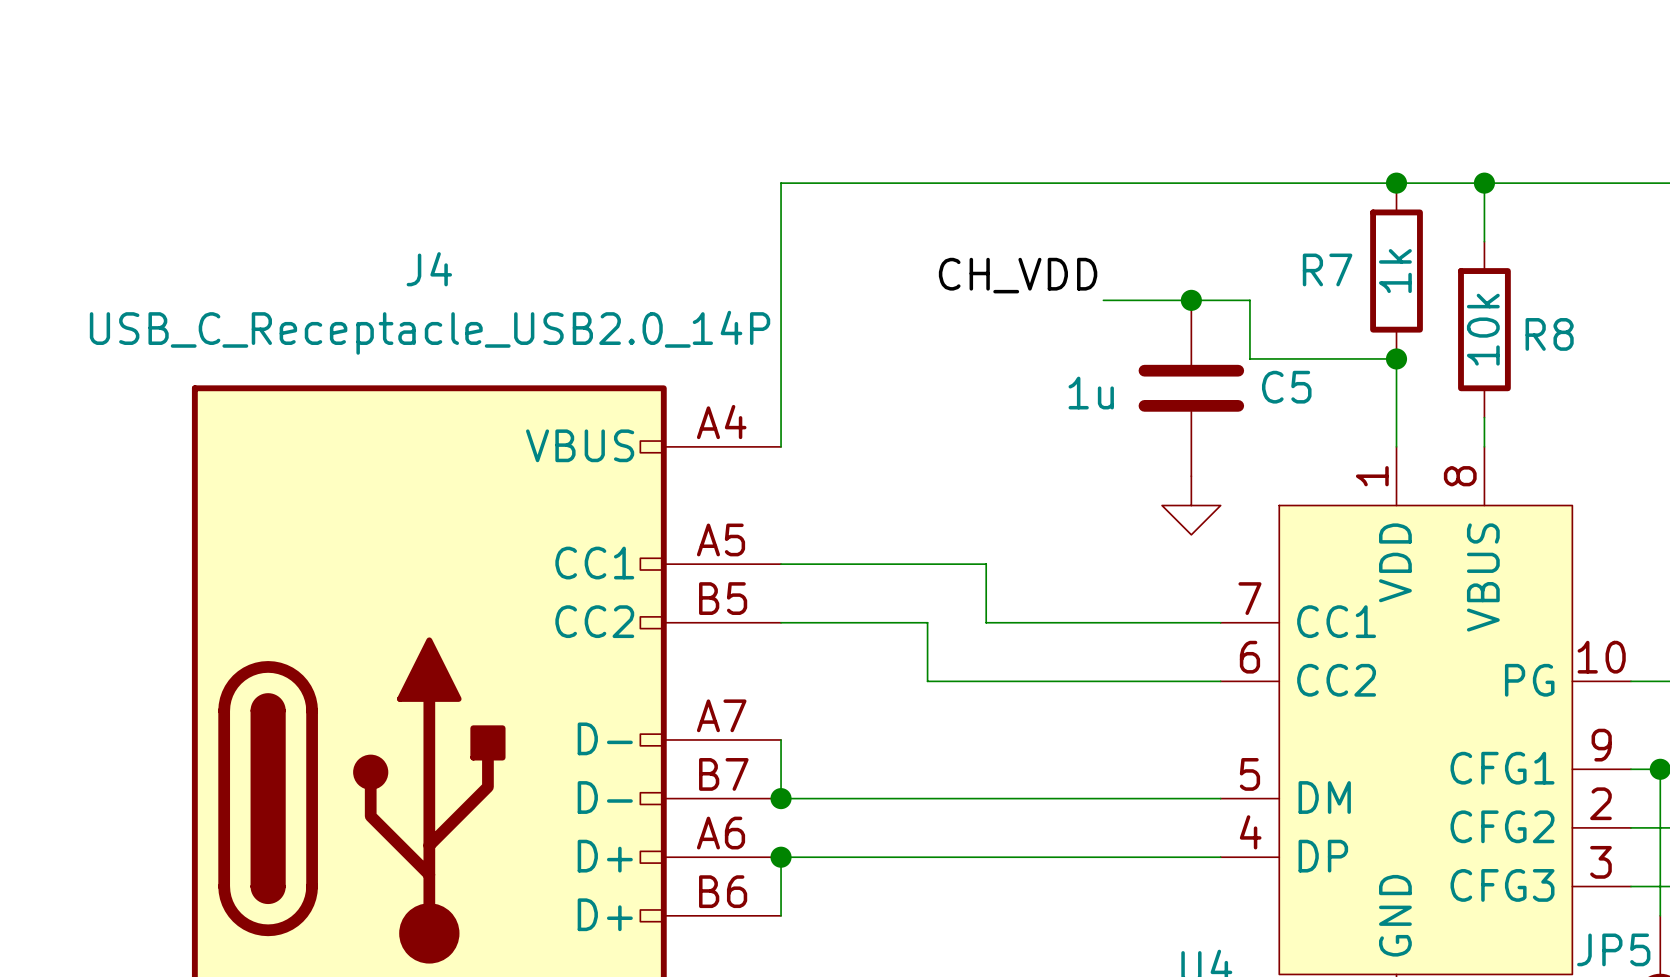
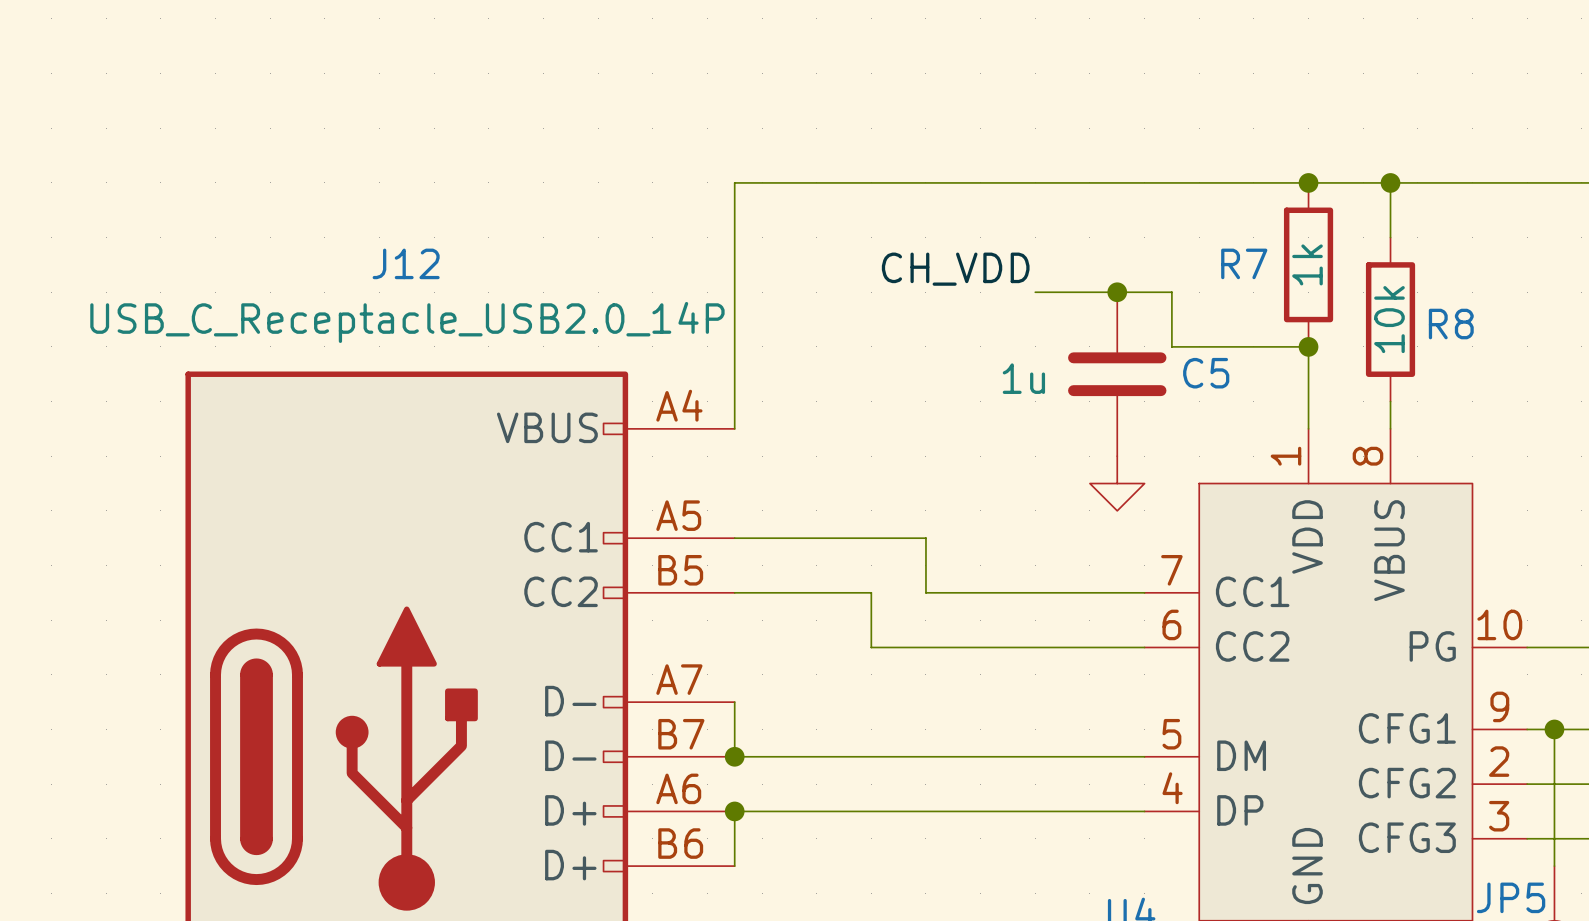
J4 name: J4 (429, 269) -> J12 (406, 263)

